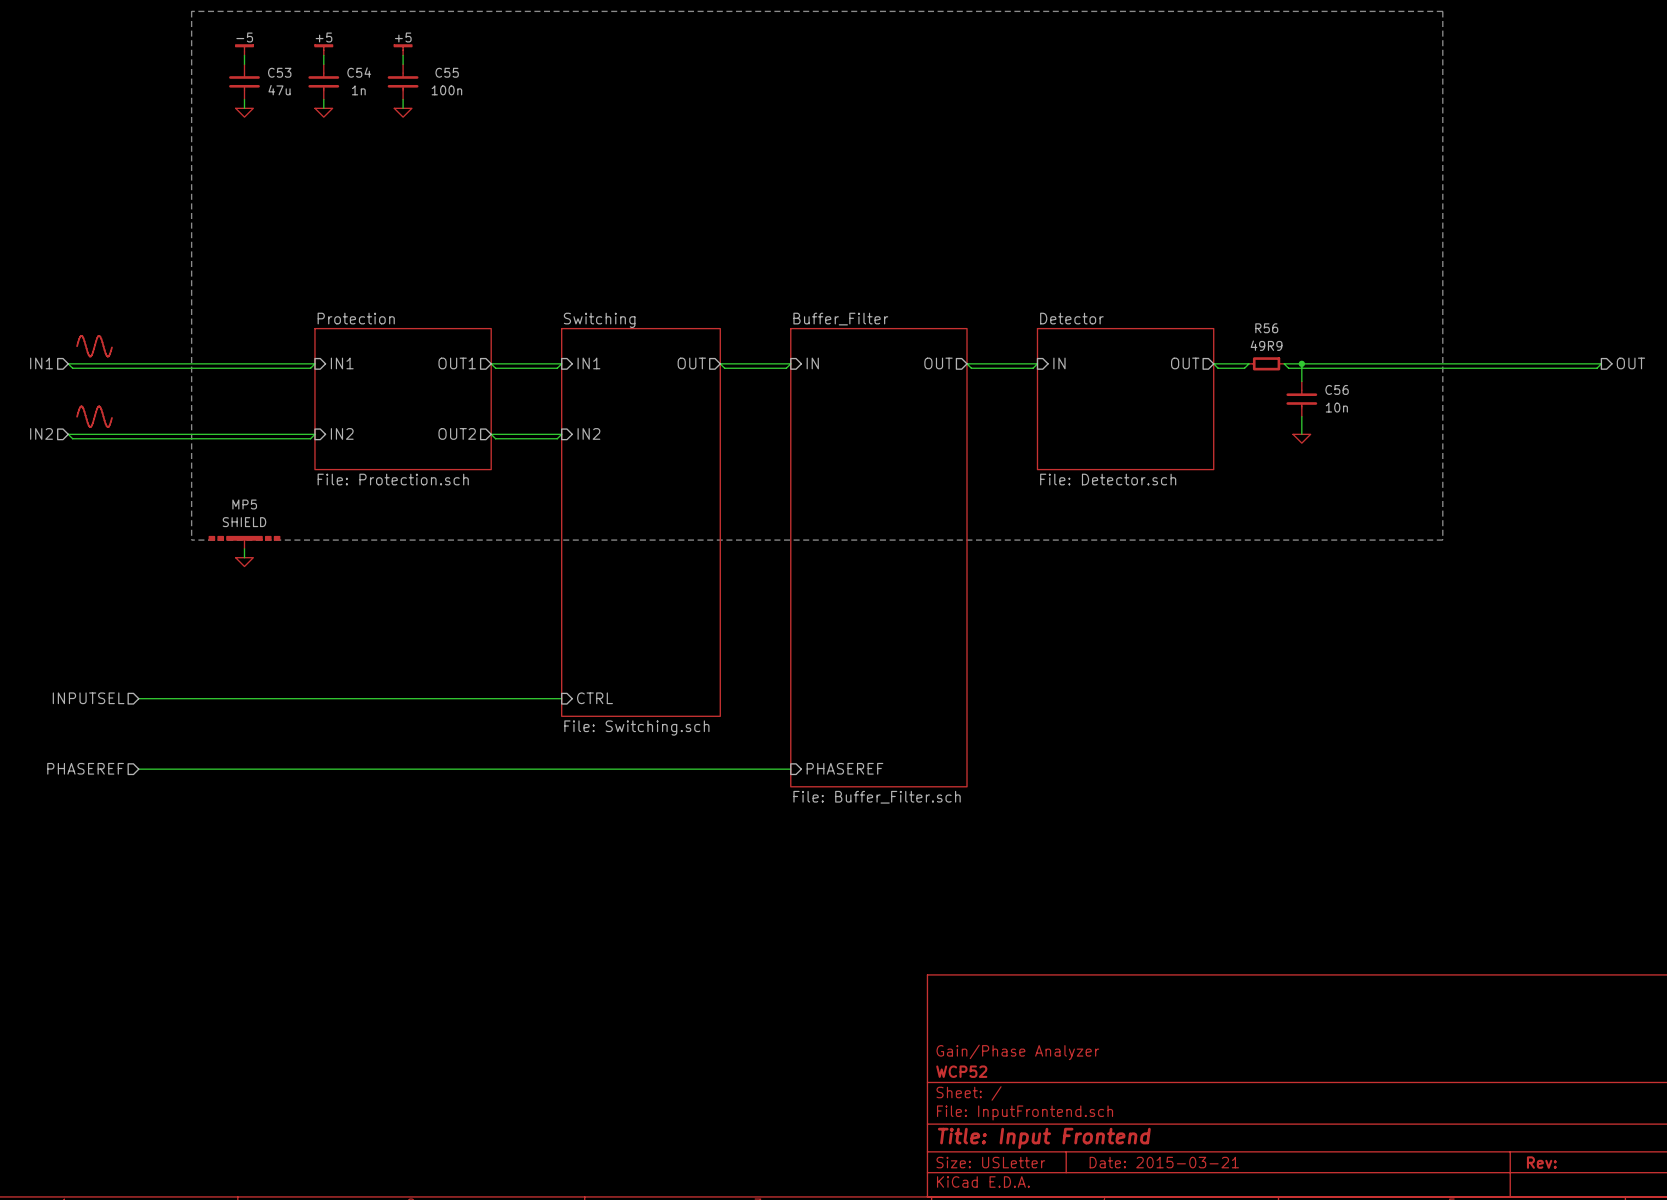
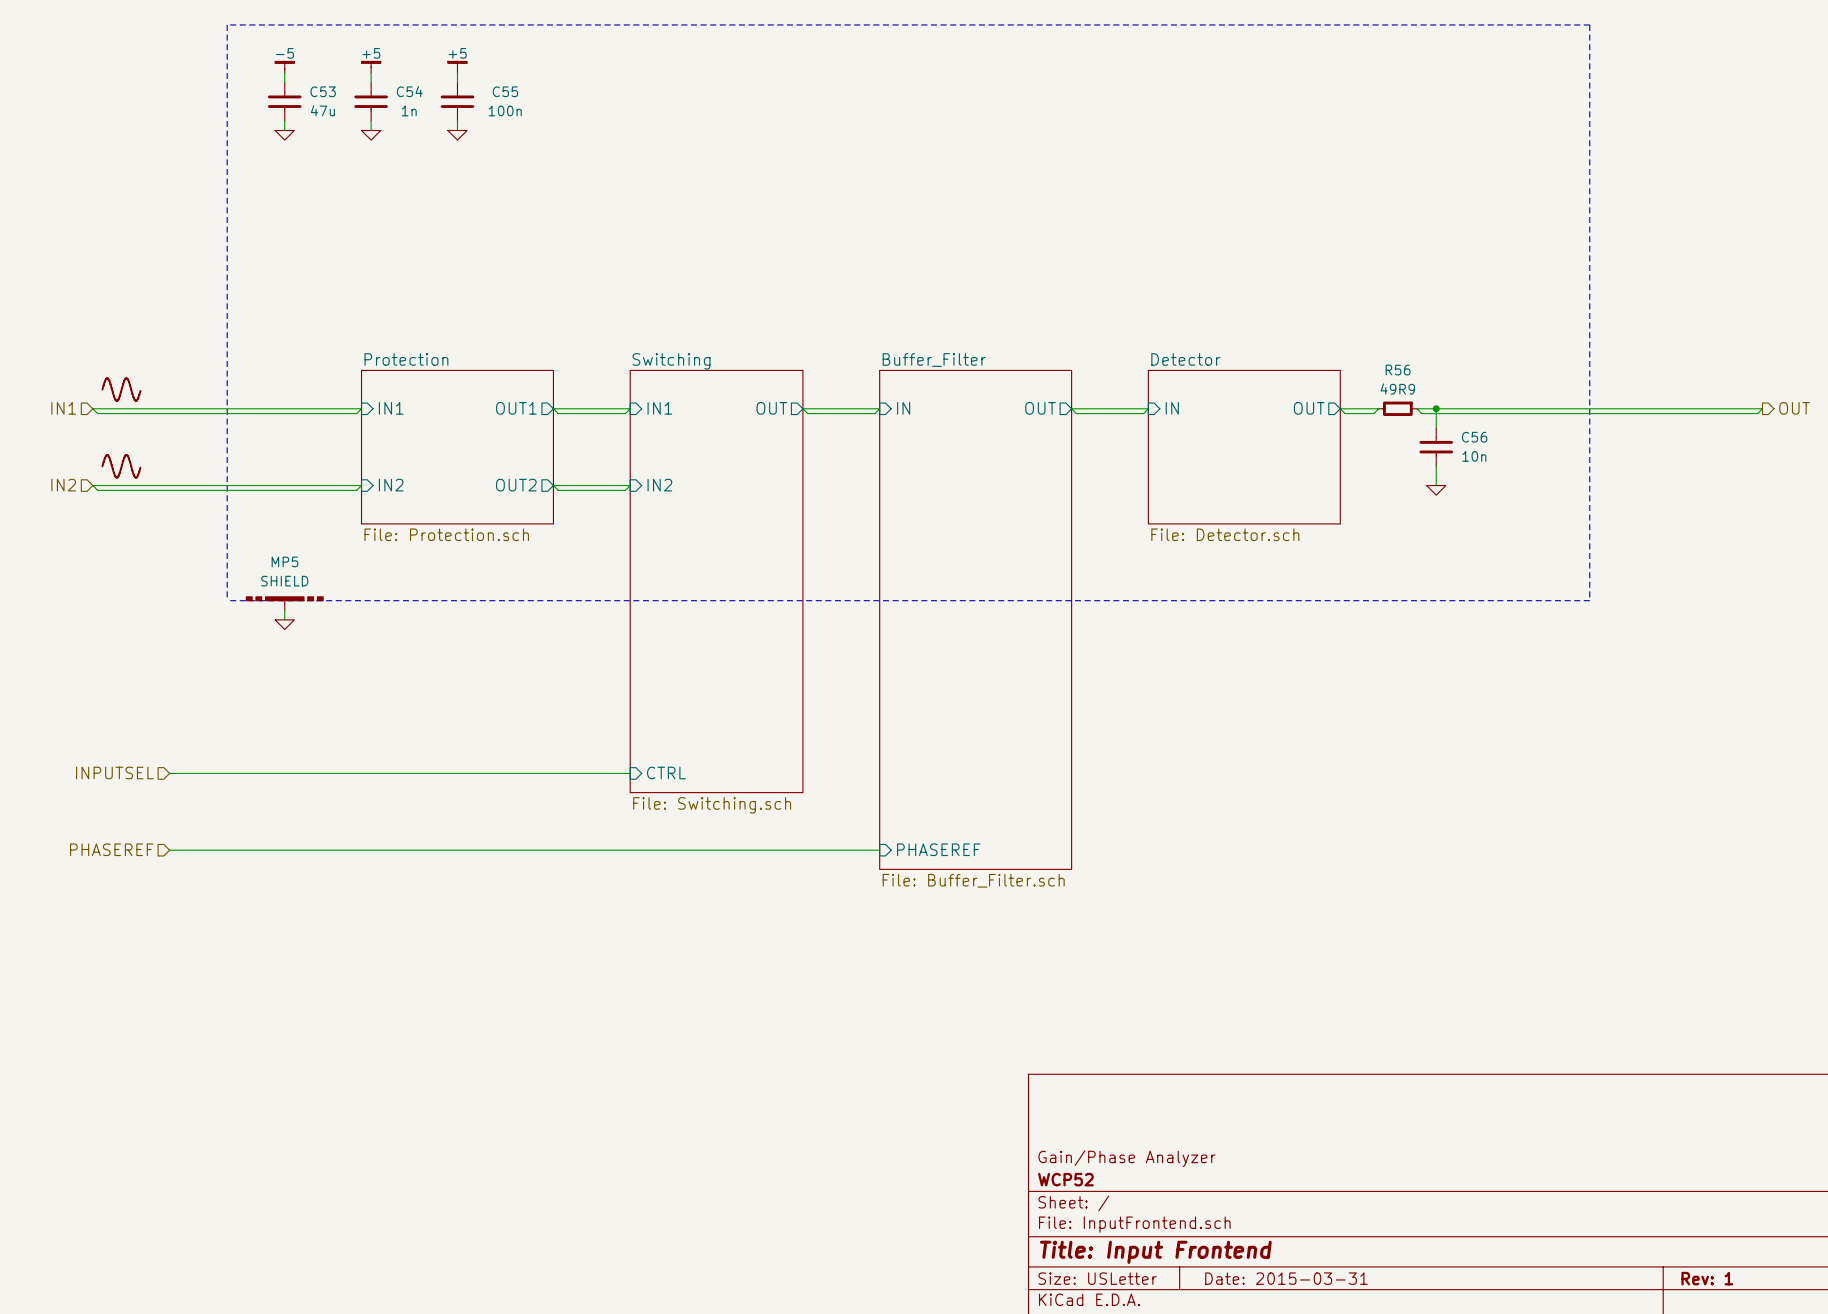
title block: Date: 2015-03-21 (1164, 1162) -> Date: 2015-03-31 (1286, 1278)
title block: Rev: (1541, 1162) -> Rev: 1 (1707, 1278)

